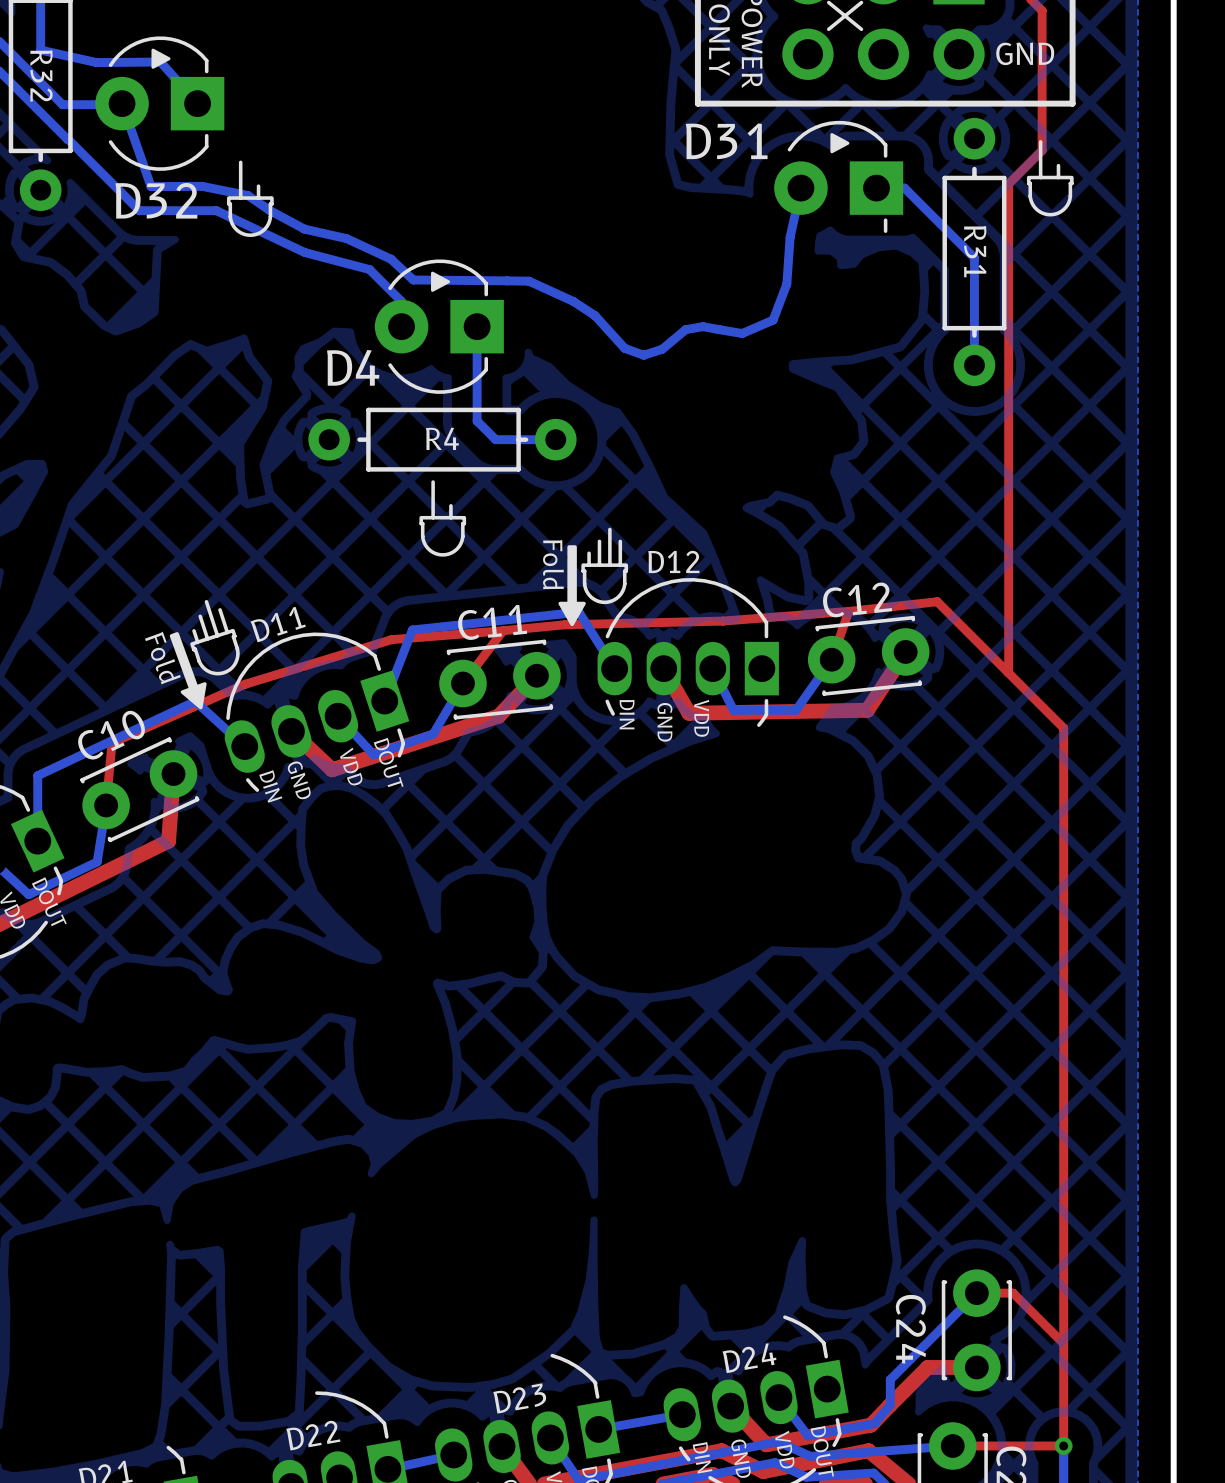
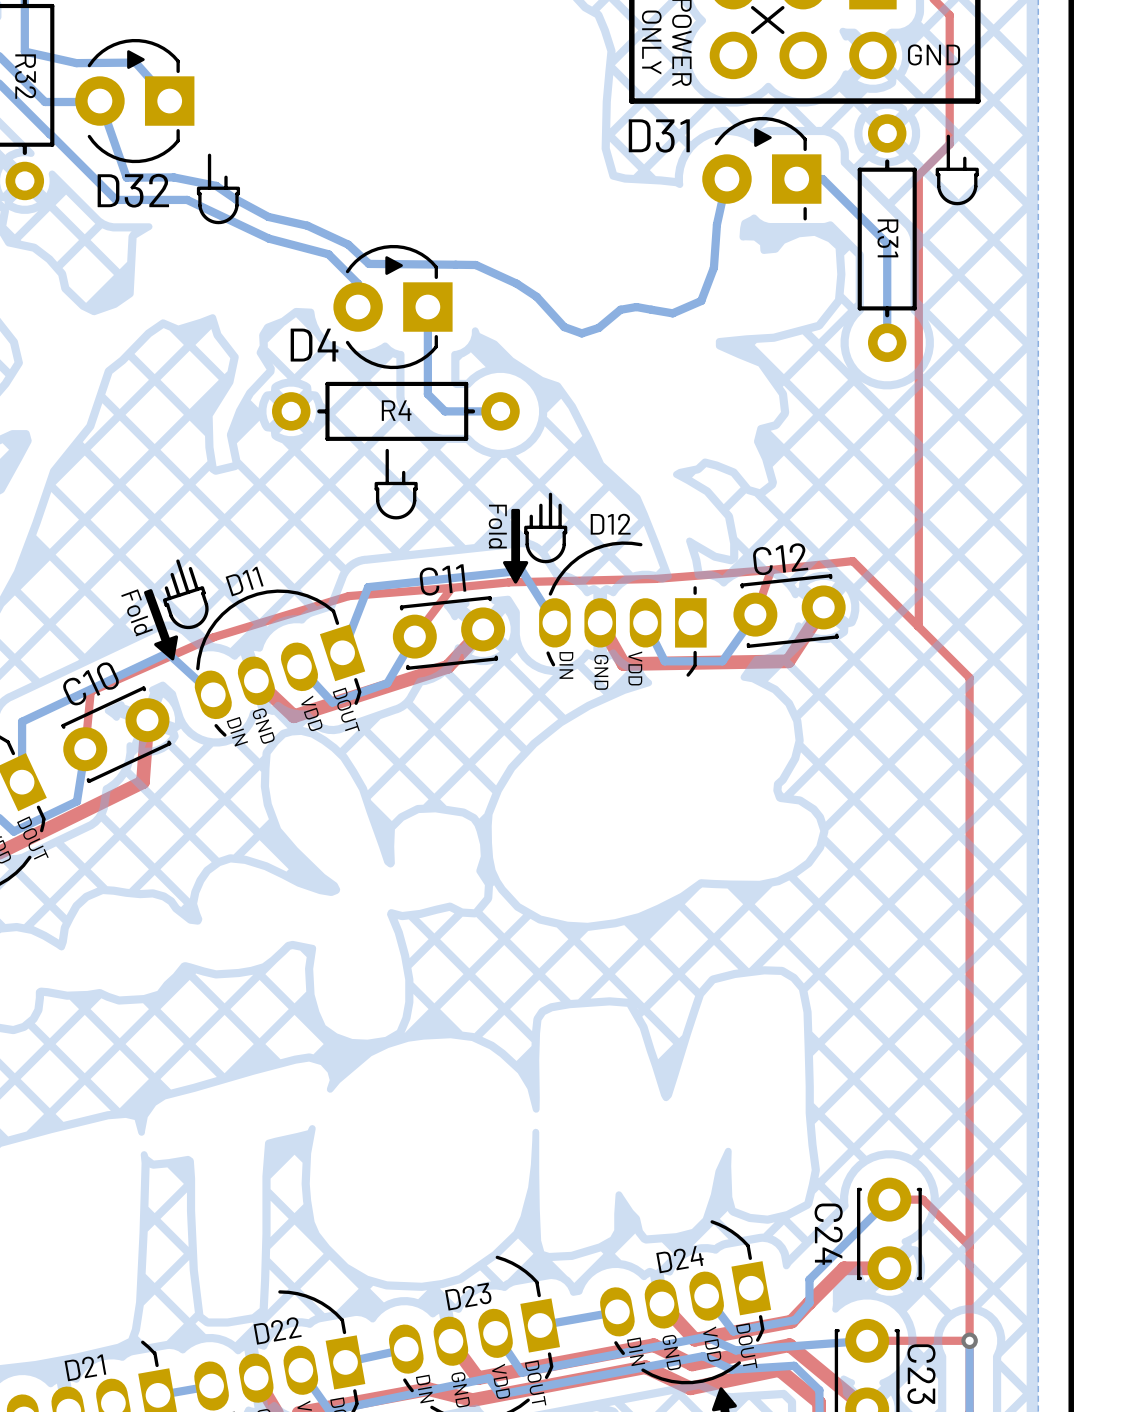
D12 footprint: [597, 578, 779, 727] -> [539, 541, 707, 677]

